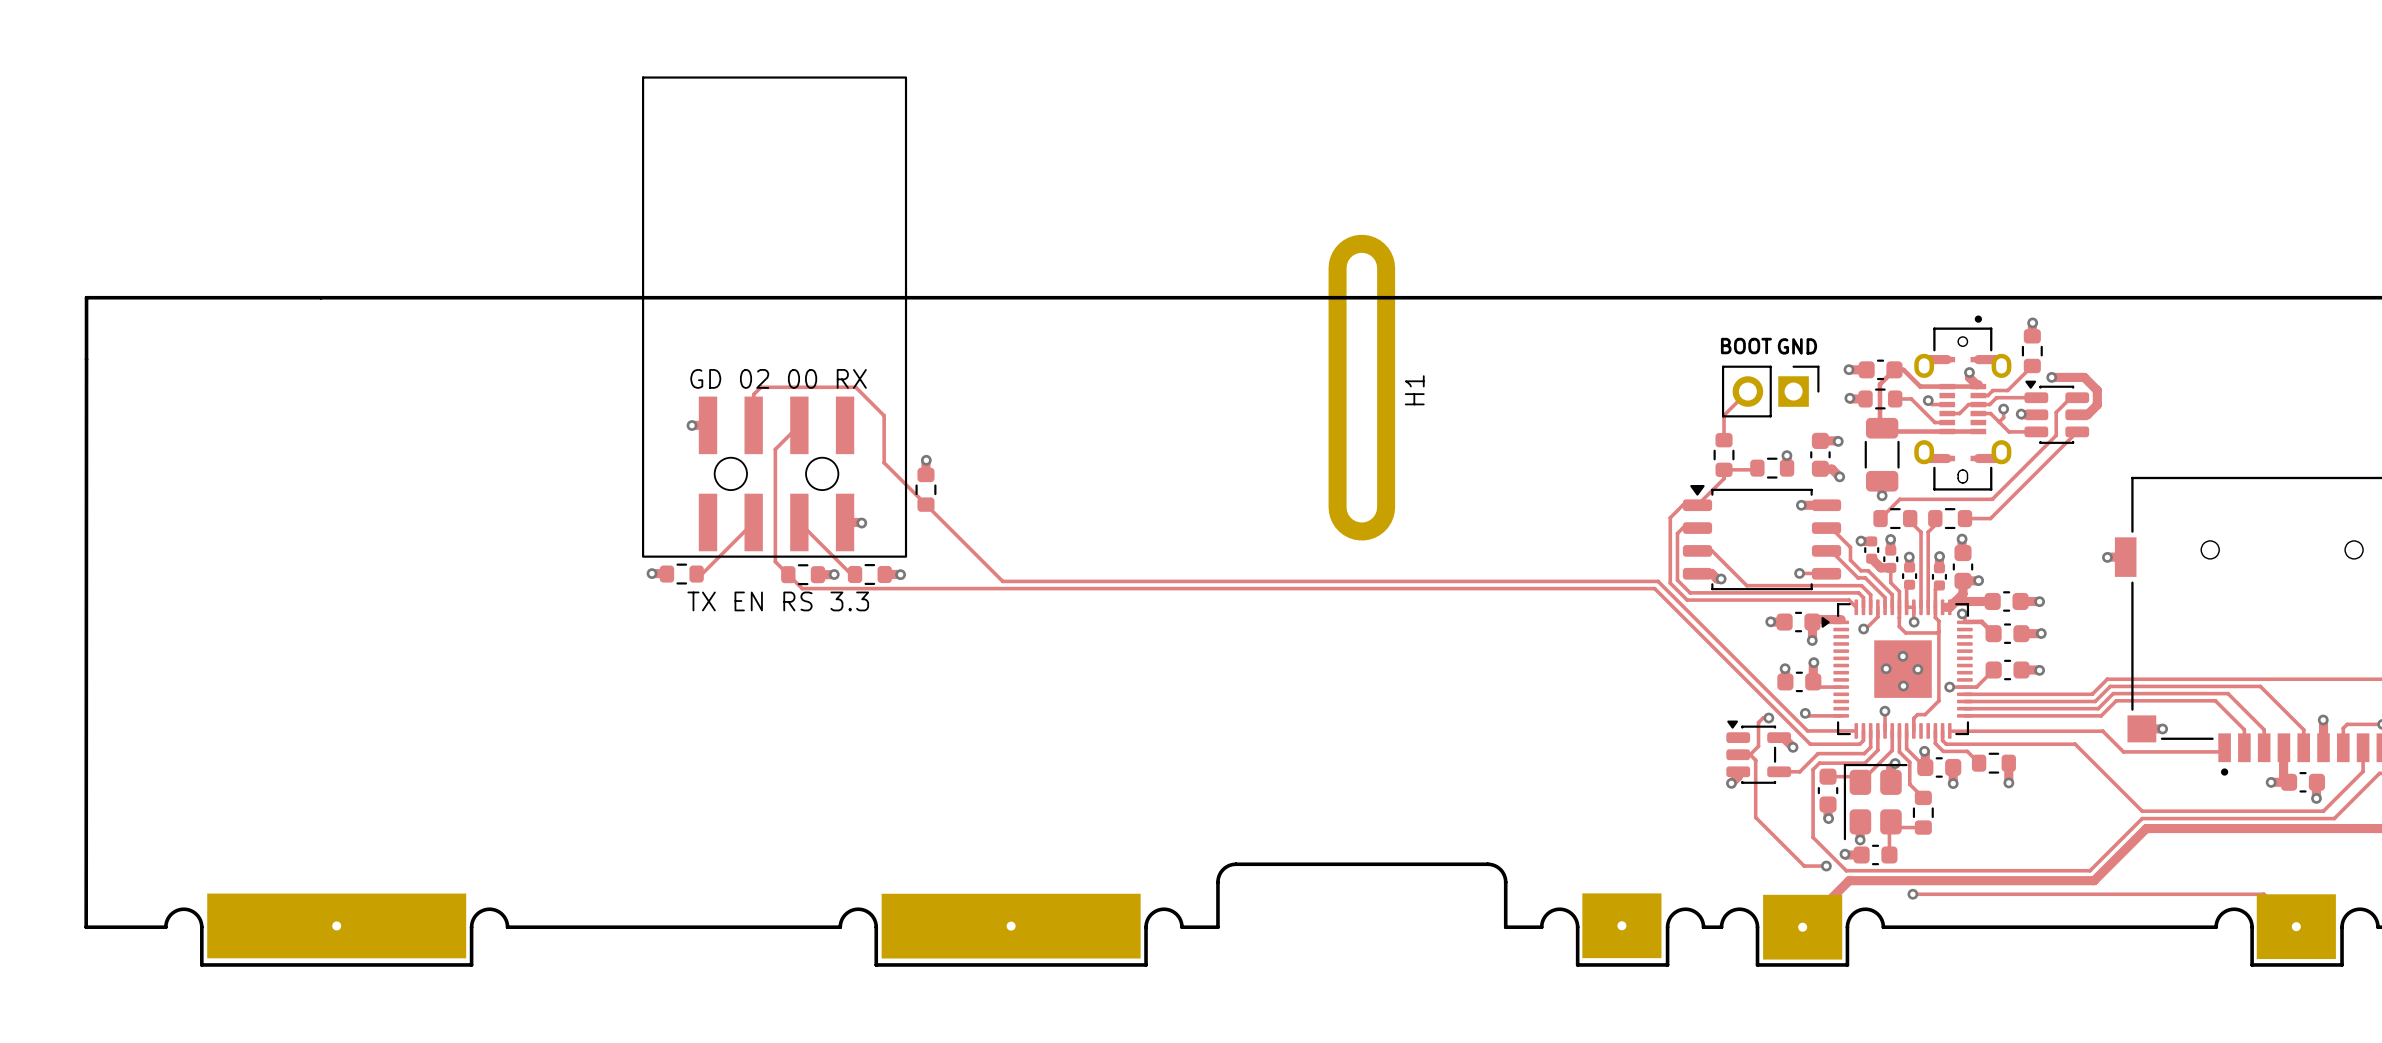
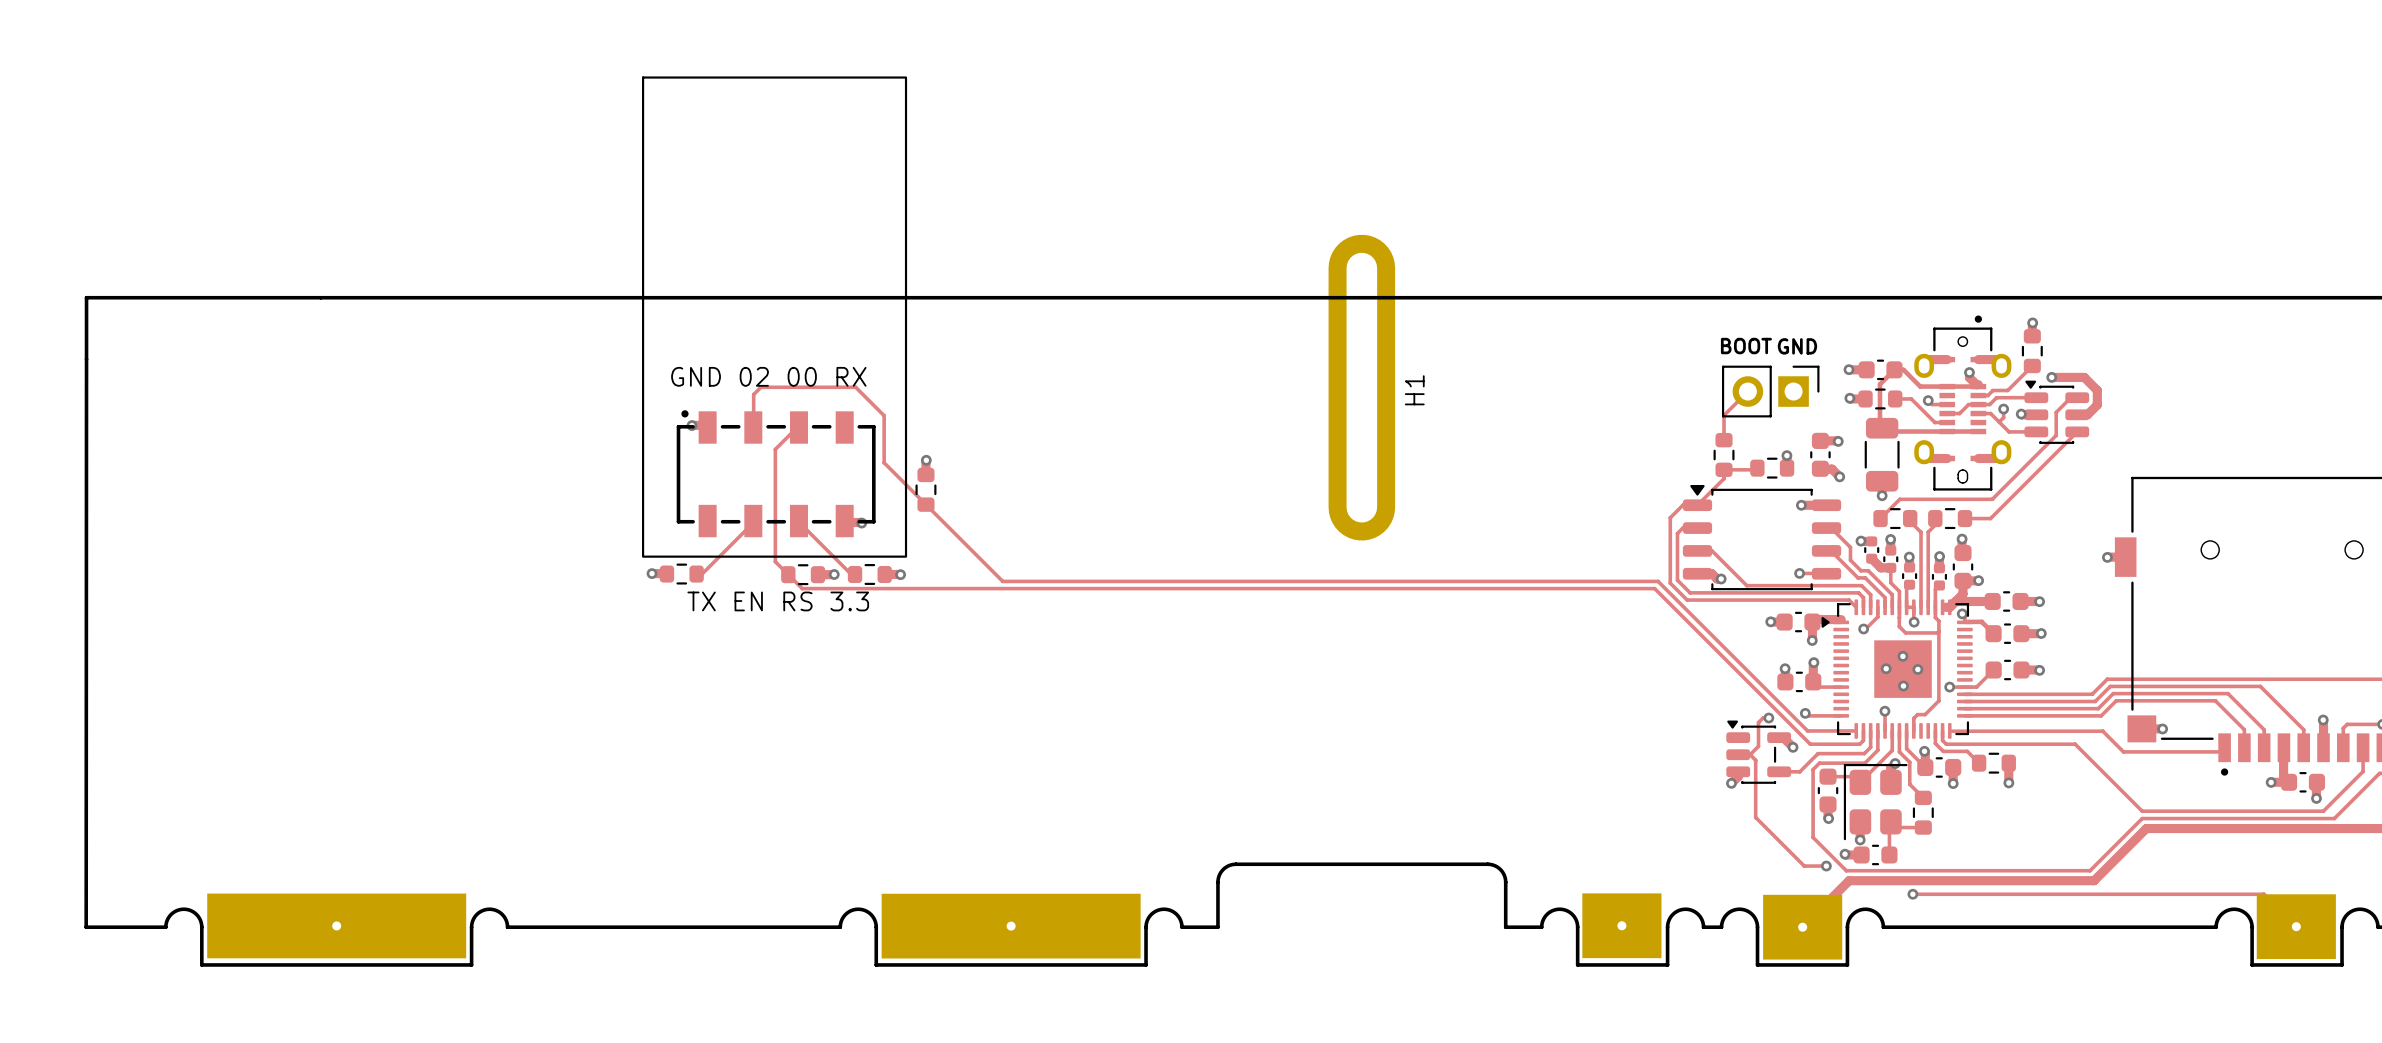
part footprint: [641, 76, 908, 558] -> [641, 76, 908, 558]

